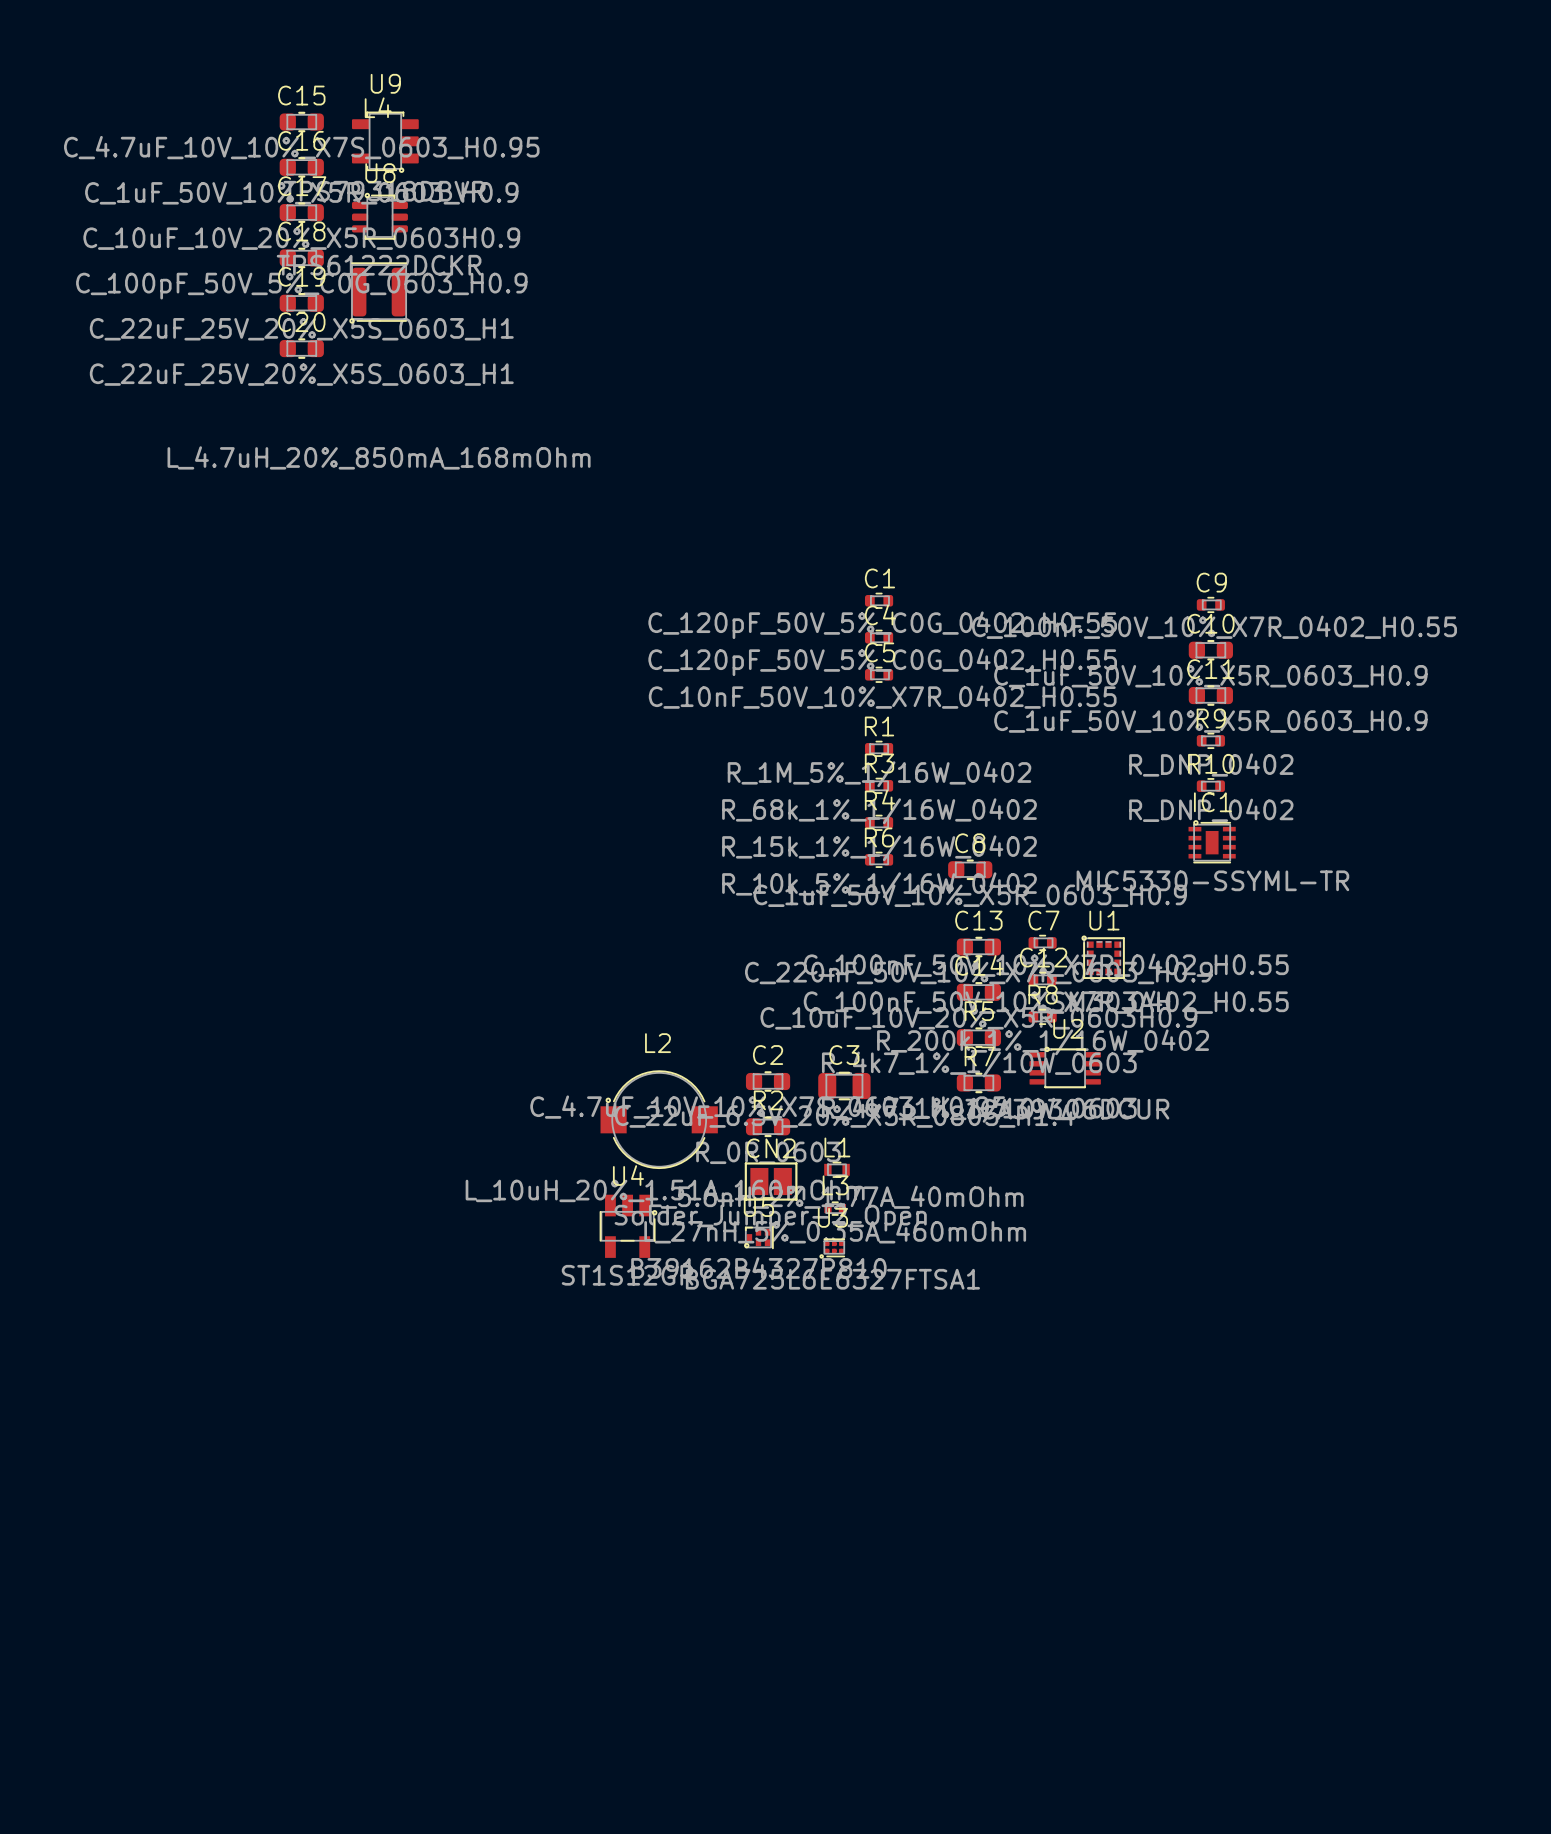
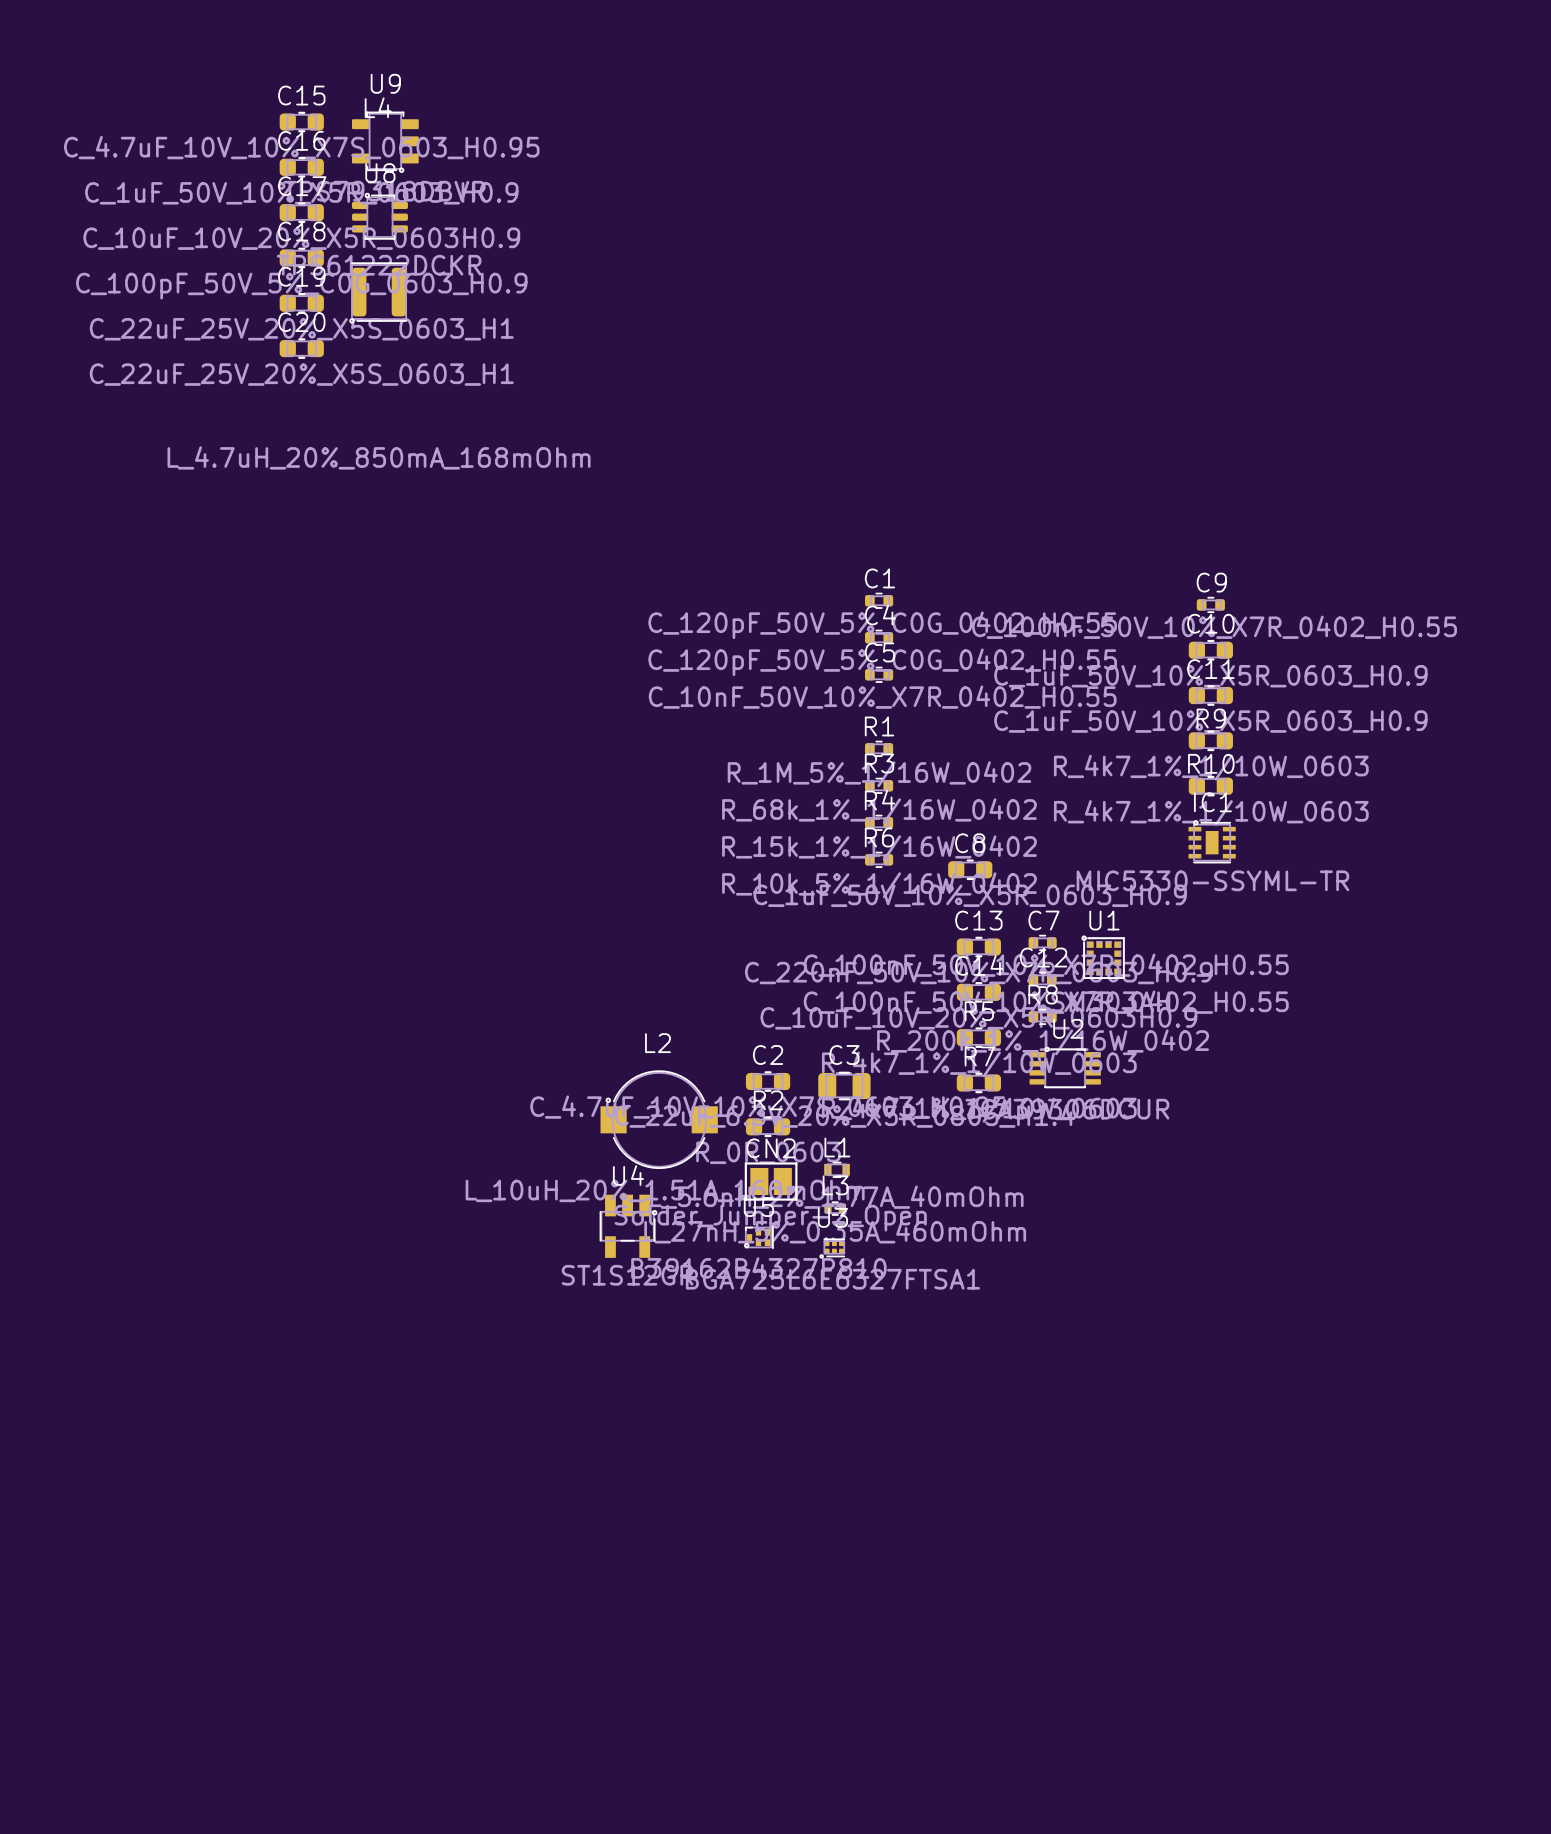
R9 footprint: [1196, 732, 1225, 749] -> [1188, 730, 1233, 752]
R9 value: R_DNP_0402 (1211, 764) -> R_4k7_1%_1/10W_0603 (1211, 767)
R10 footprint: [1196, 778, 1225, 795] -> [1188, 775, 1233, 797]
R10 value: R_DNP_0402 (1211, 810) -> R_4k7_1%_1/10W_0603 (1211, 813)

